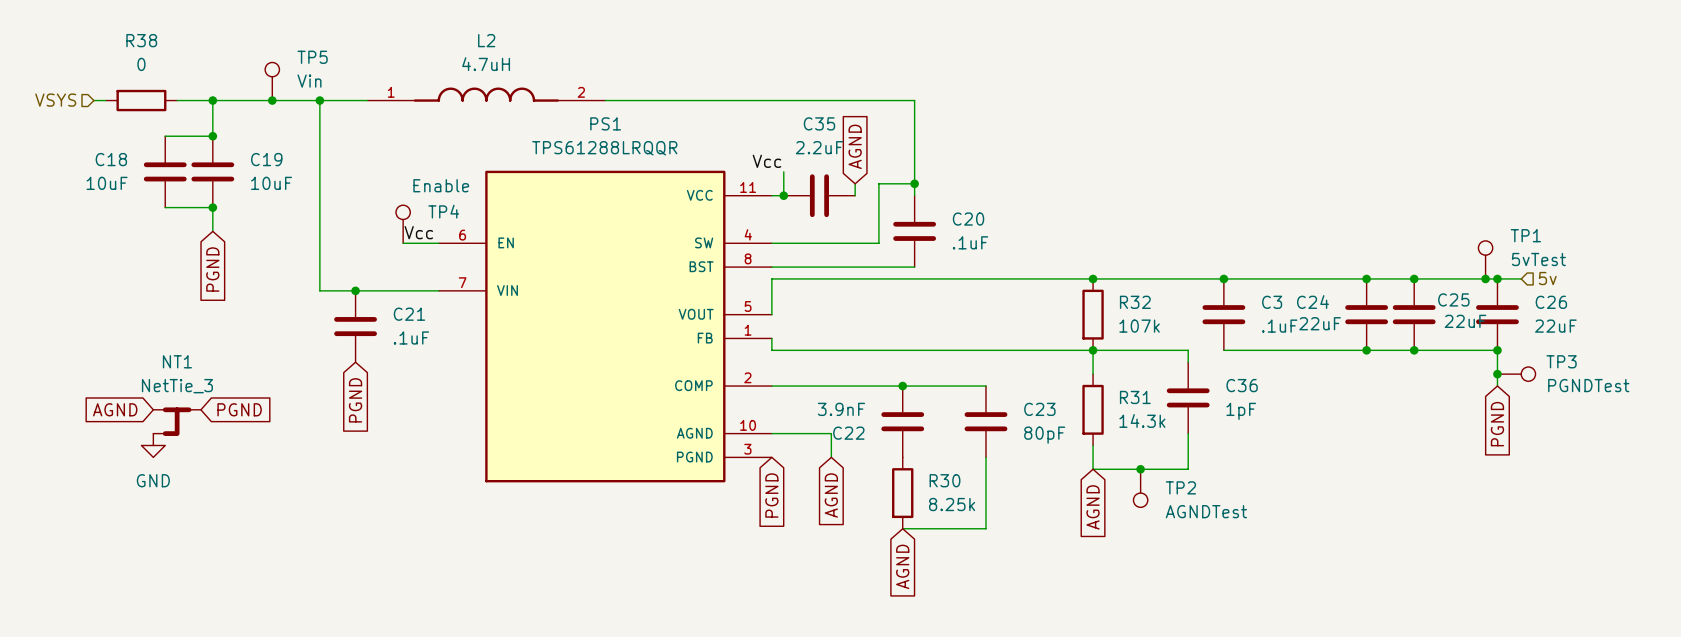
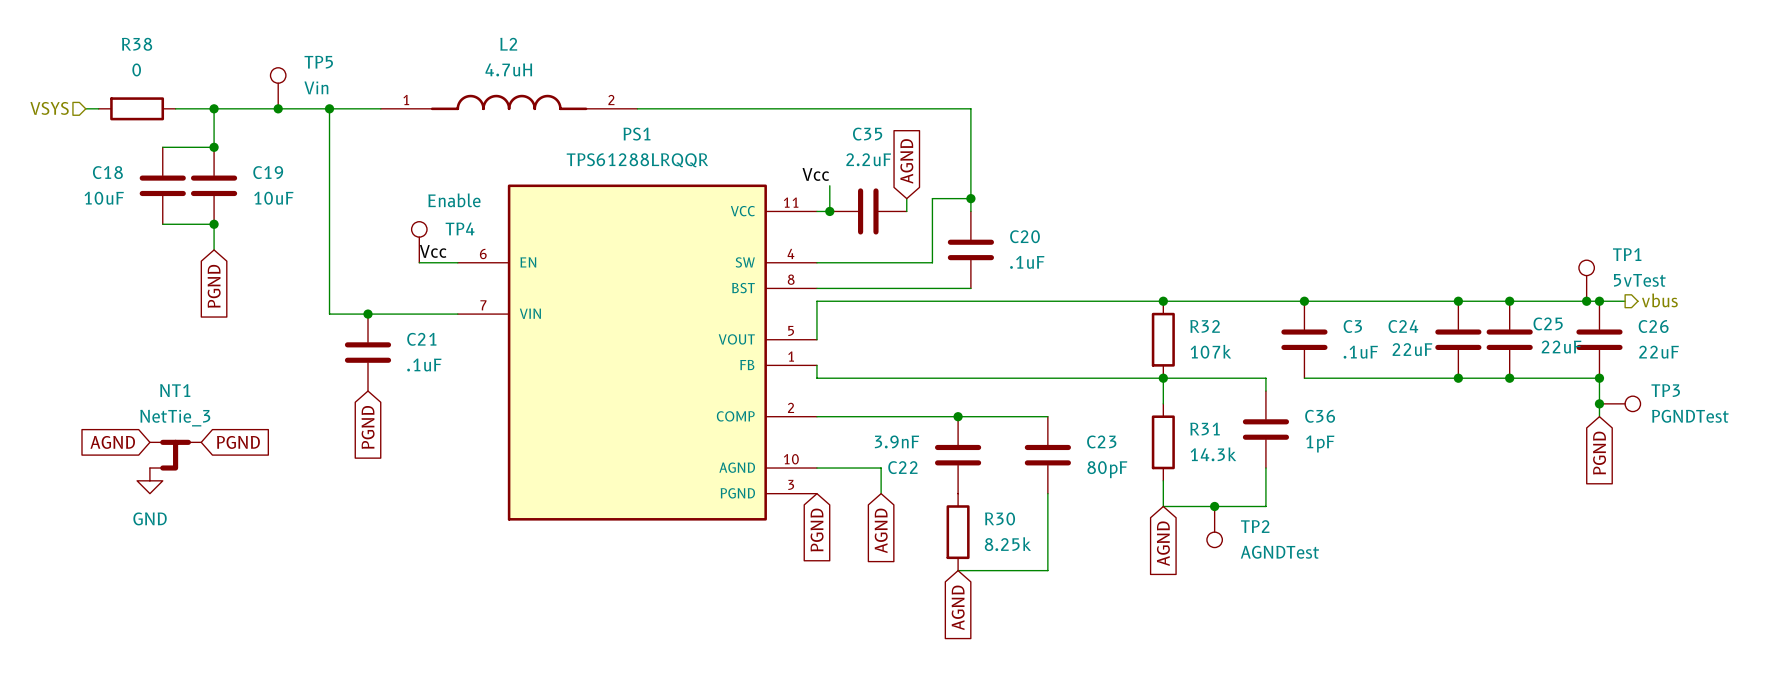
hierarchical label shape: input (1547, 278) -> output (1659, 300)
hierarchical label: 5v (1547, 278) -> vbus (1659, 300)

